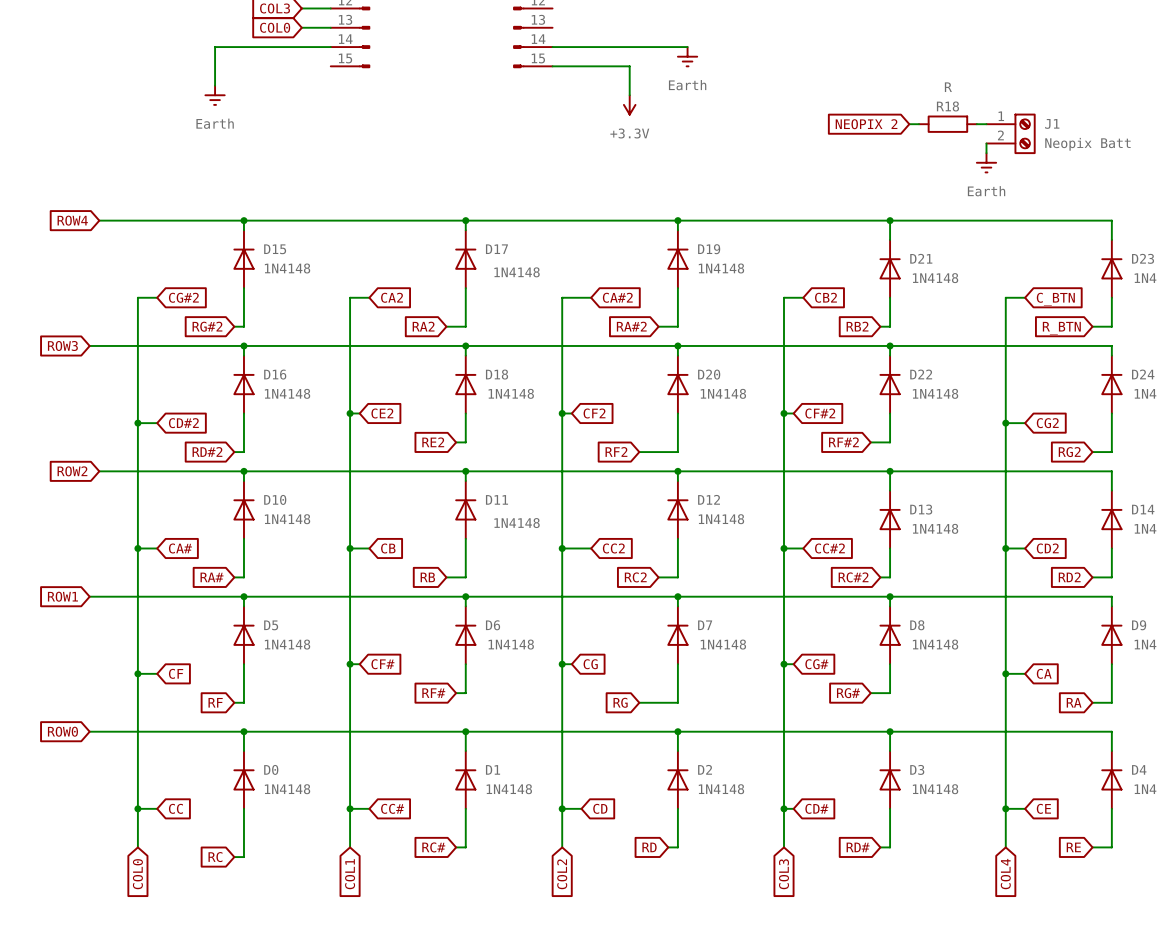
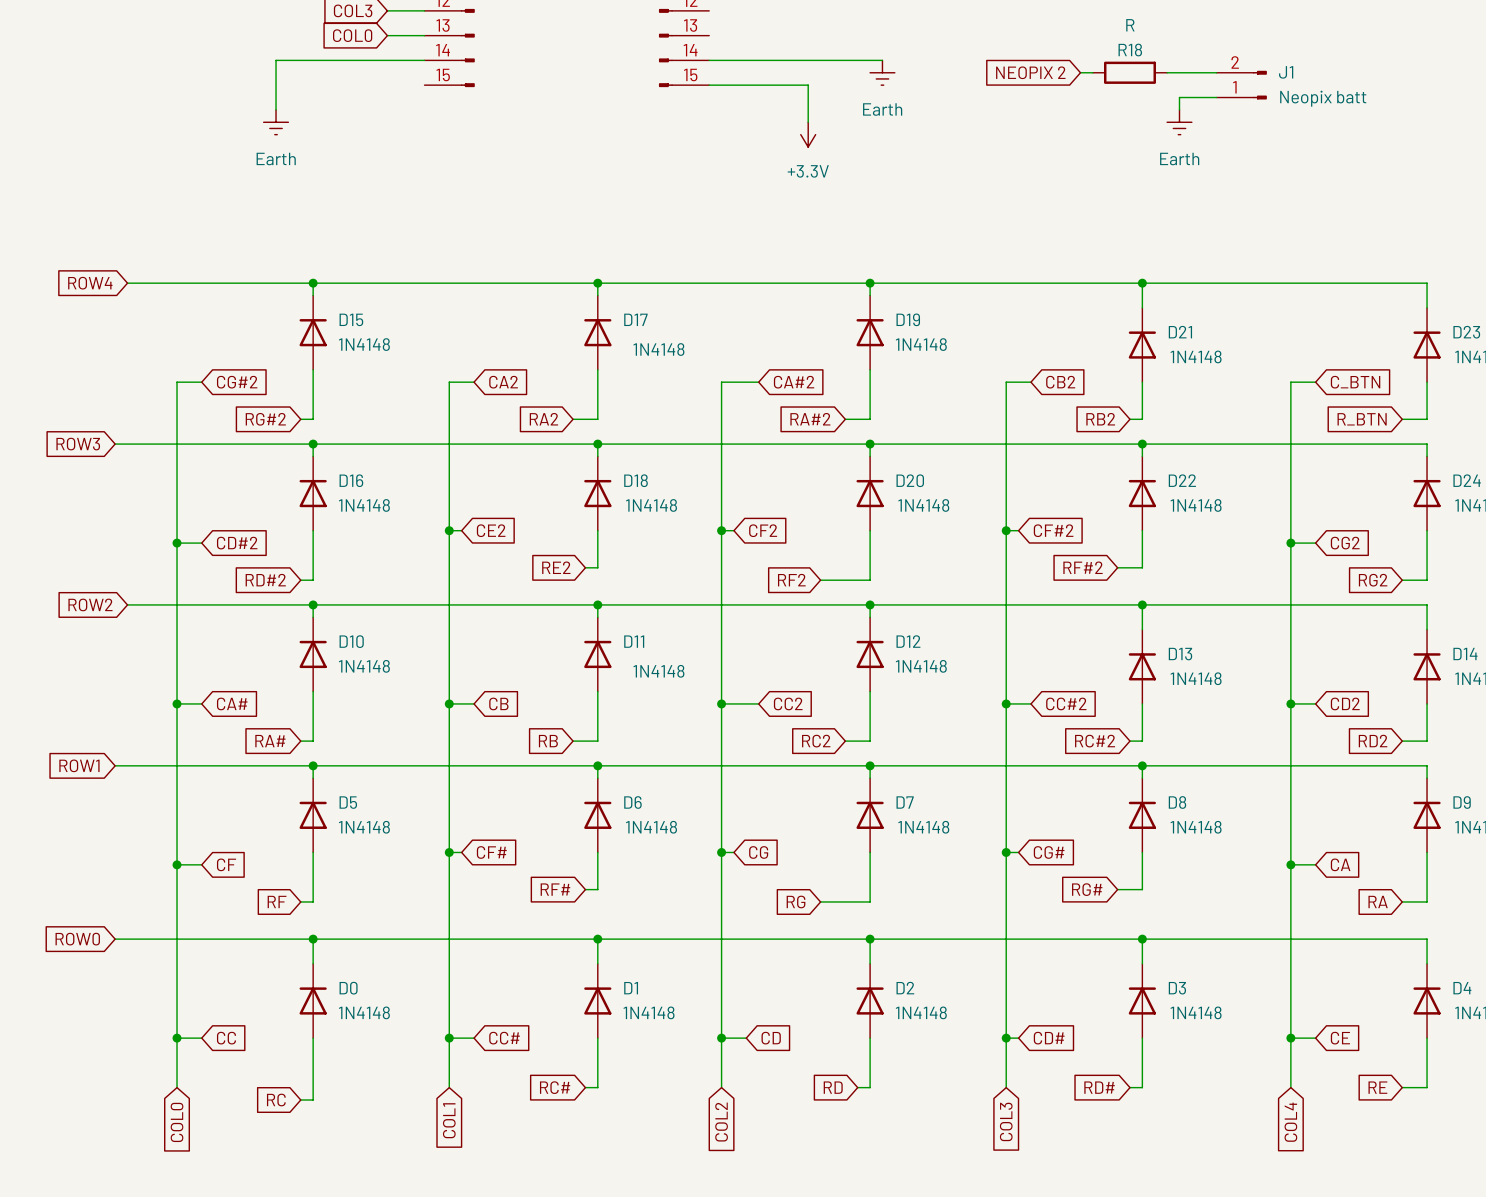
wire: none -> (1167, 72) (1216, 72)
wire: none -> (1216, 97) (1179, 97) (1179, 109)
power symbol: none -> Earth (1179, 122)
J1 symbol: [986, 113, 1036, 155] -> [1216, 70, 1267, 100]
global label position: NEOPIX 2 (866, 124) -> NEOPIX 2 (1030, 72)
wire: (909, 124) (919, 124) -> (1080, 72) (1092, 72)
R18 position: (947, 124) -> (1129, 72)
wire: (976, 124) (986, 124) -> none
wire: (986, 143) (986, 153) -> none
J1 value: Neopix Batt (1087, 144) -> Neopix batt (1323, 98)
power symbol: Earth (986, 162) -> none

